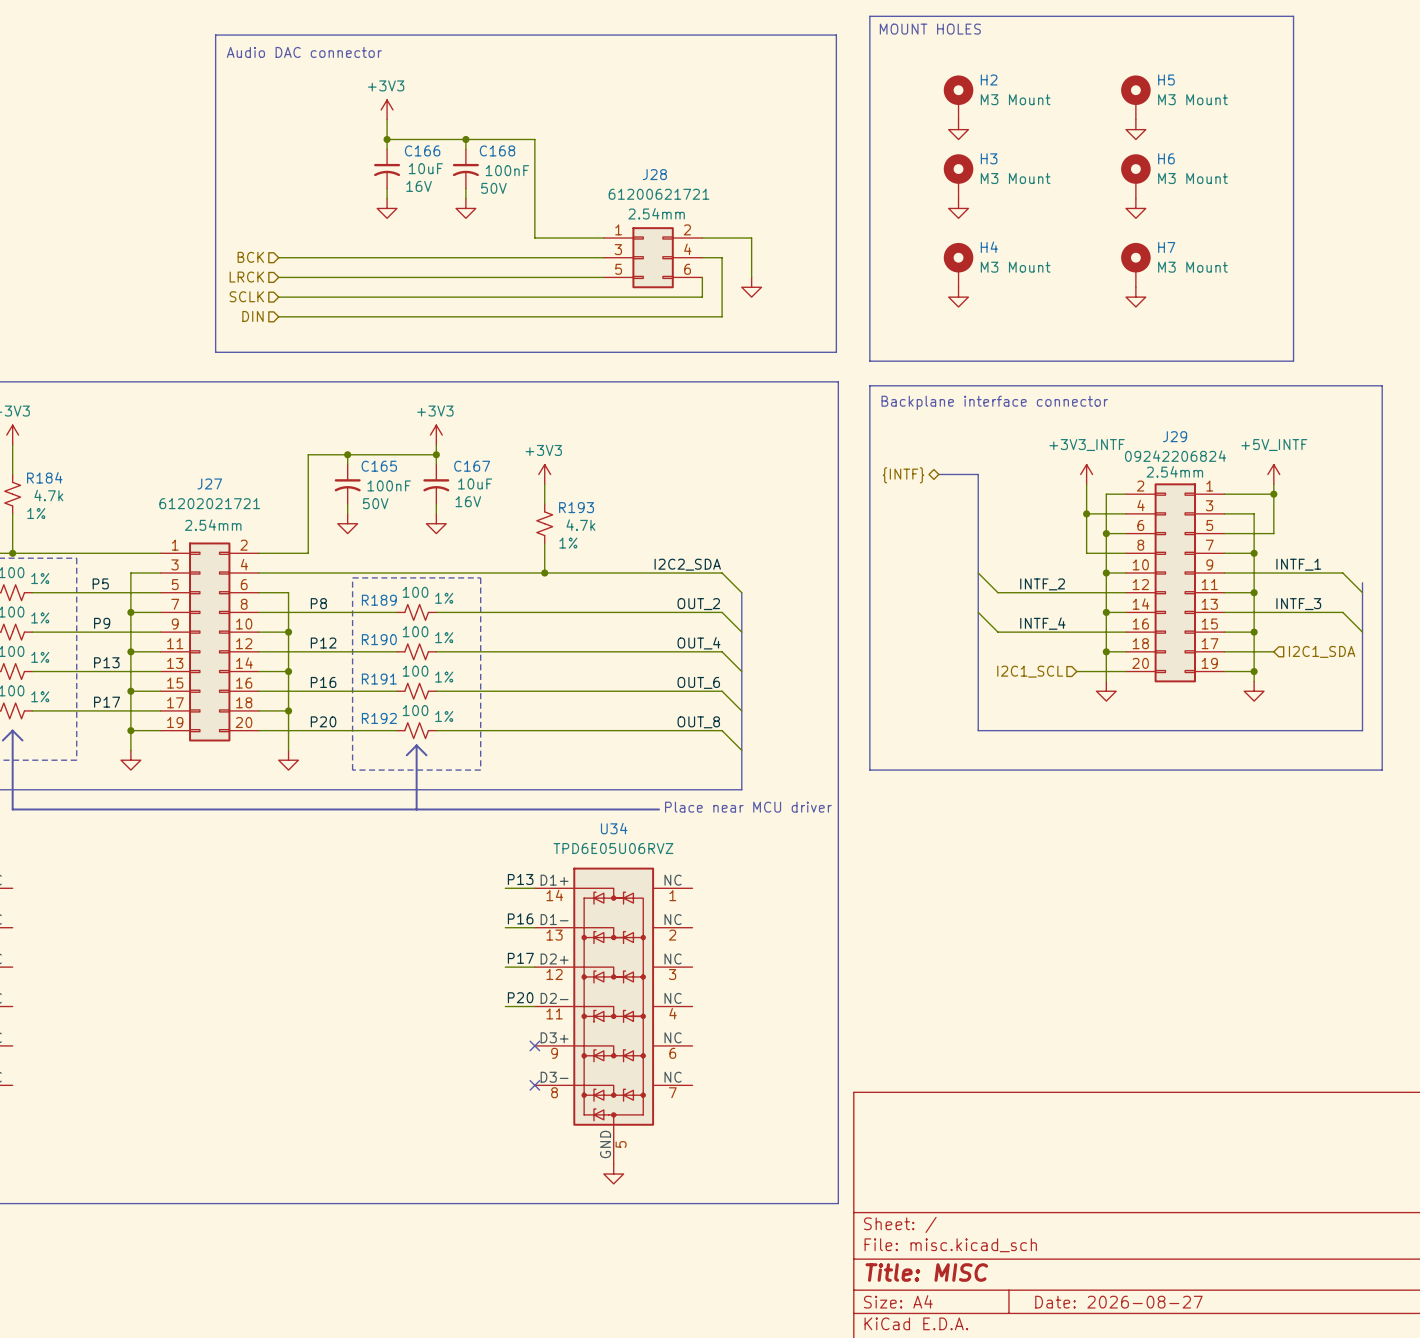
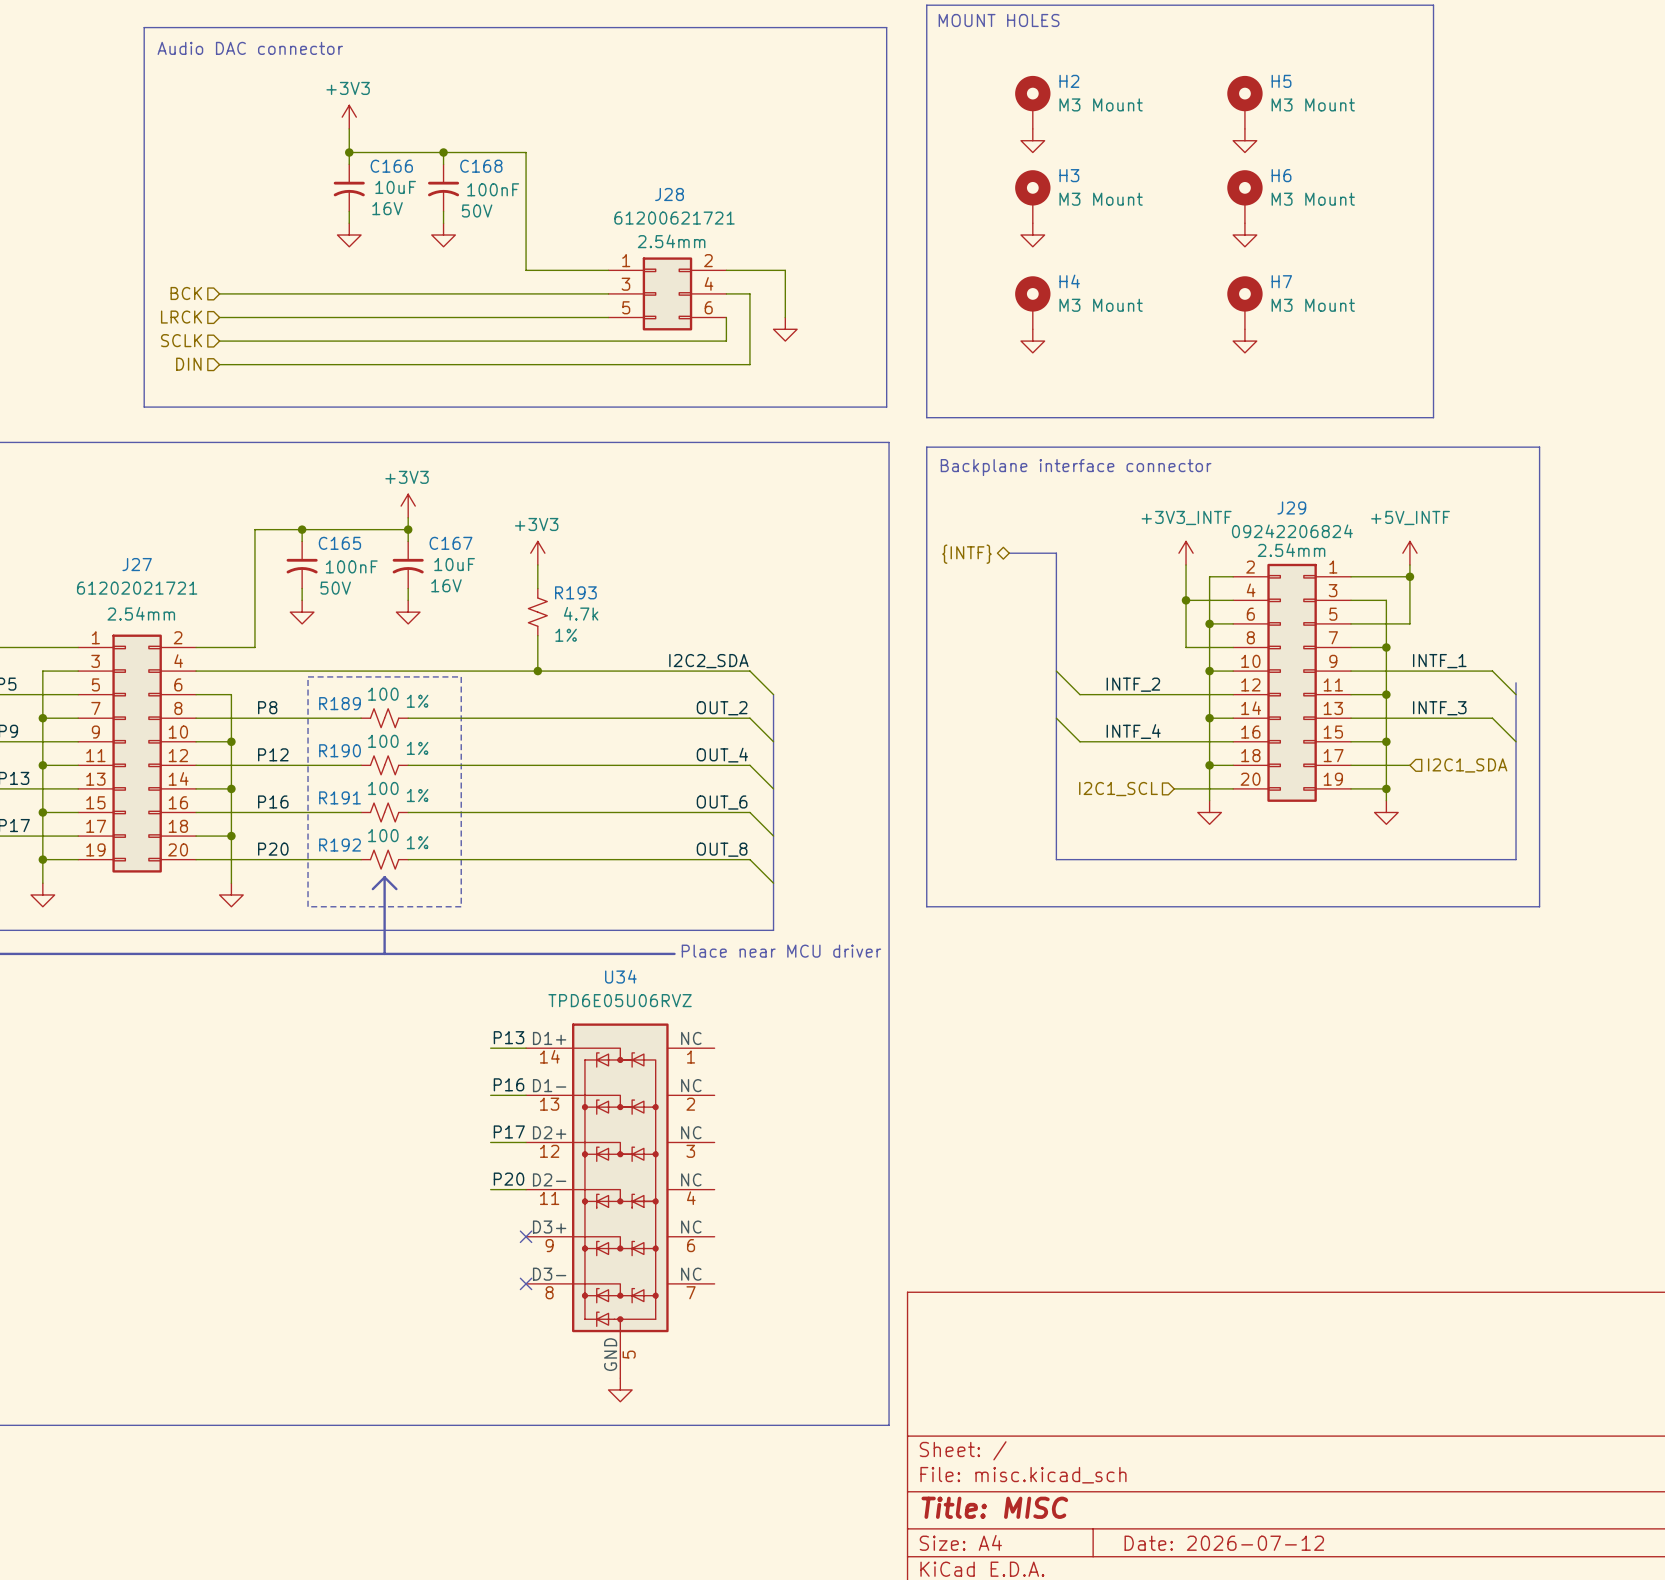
title block: Date: 2026-08-27 (1118, 1302) -> Date: 2026-07-12 (1224, 1543)

